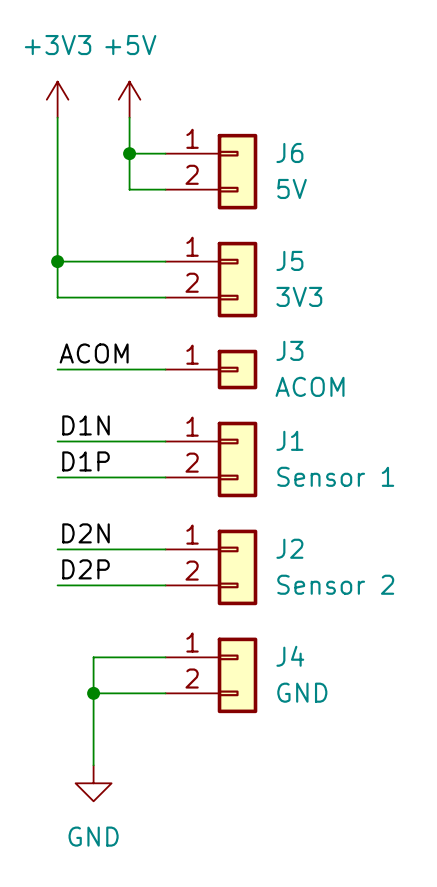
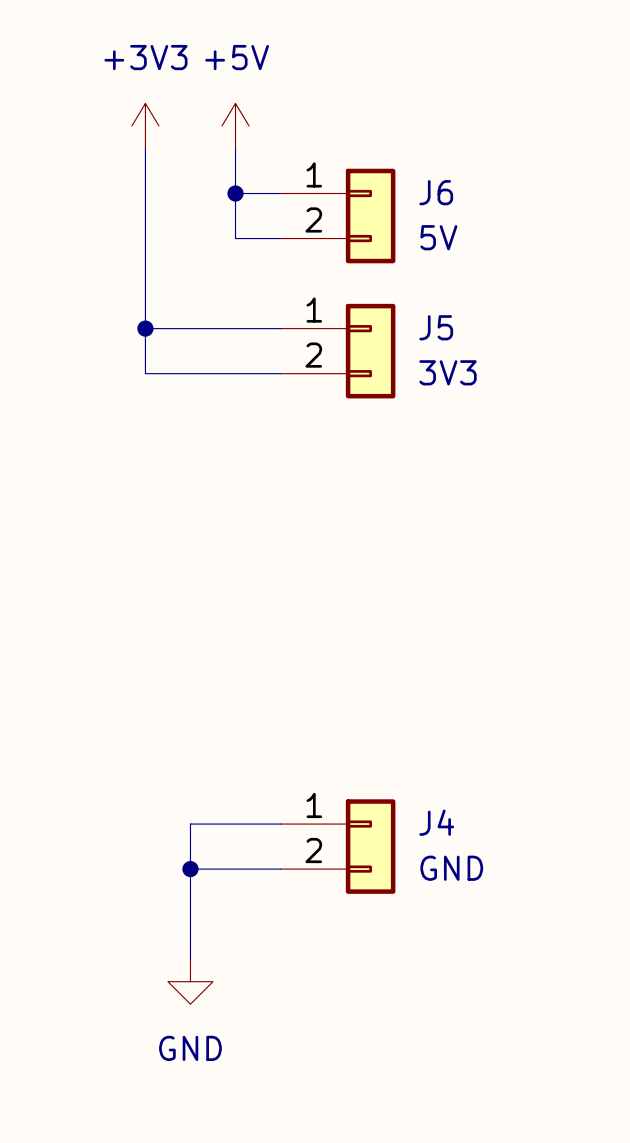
label: ACOM (94, 353) -> none
wire: (57, 369) (165, 369) -> none
J3: ACOM (211, 369) -> none
label: D1N (86, 425) -> none
wire: (57, 441) (165, 441) -> none
J1: Sensor 1 (211, 459) -> none
label: D1P (86, 461) -> none
wire: (57, 477) (165, 477) -> none
label: D2N (86, 533) -> none
wire: (57, 549) (165, 549) -> none
J2: Sensor 2 (211, 567) -> none
label: D2P (86, 569) -> none
wire: (57, 585) (165, 585) -> none

